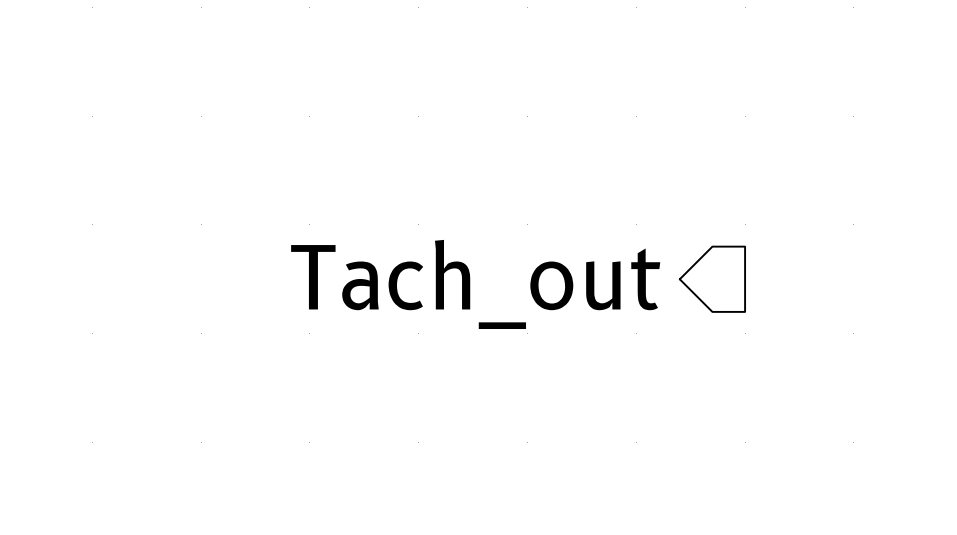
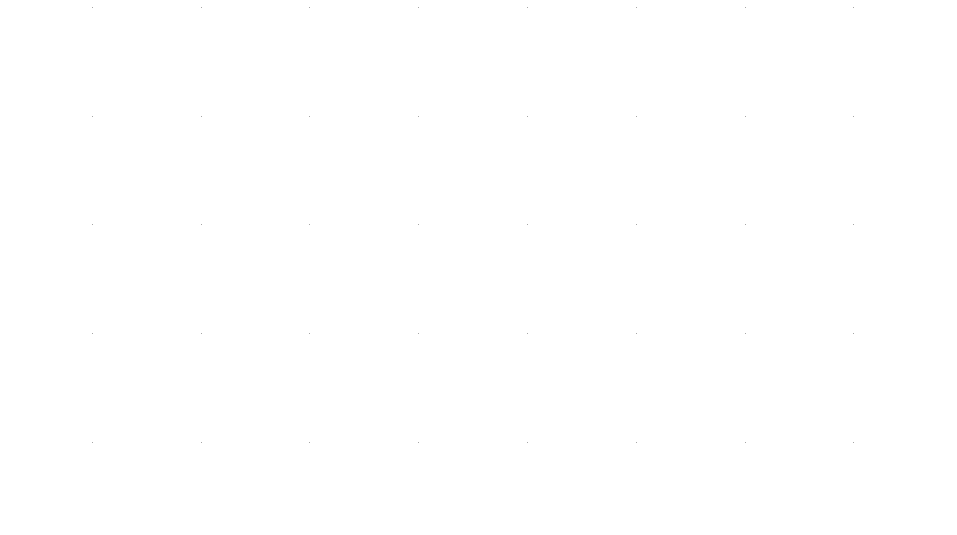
hierarchical label: Tach_out (475, 284) -> none

